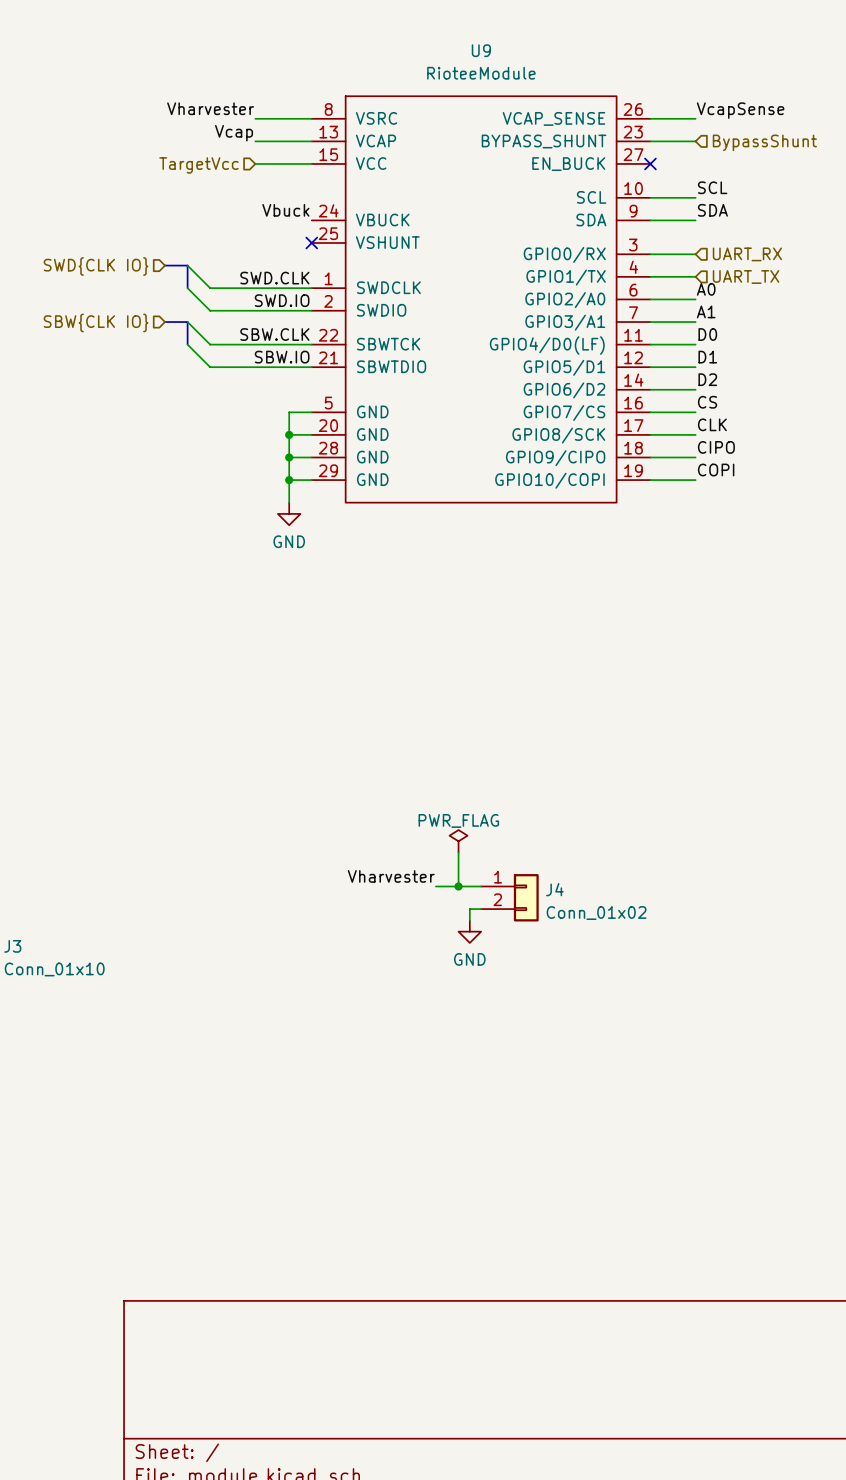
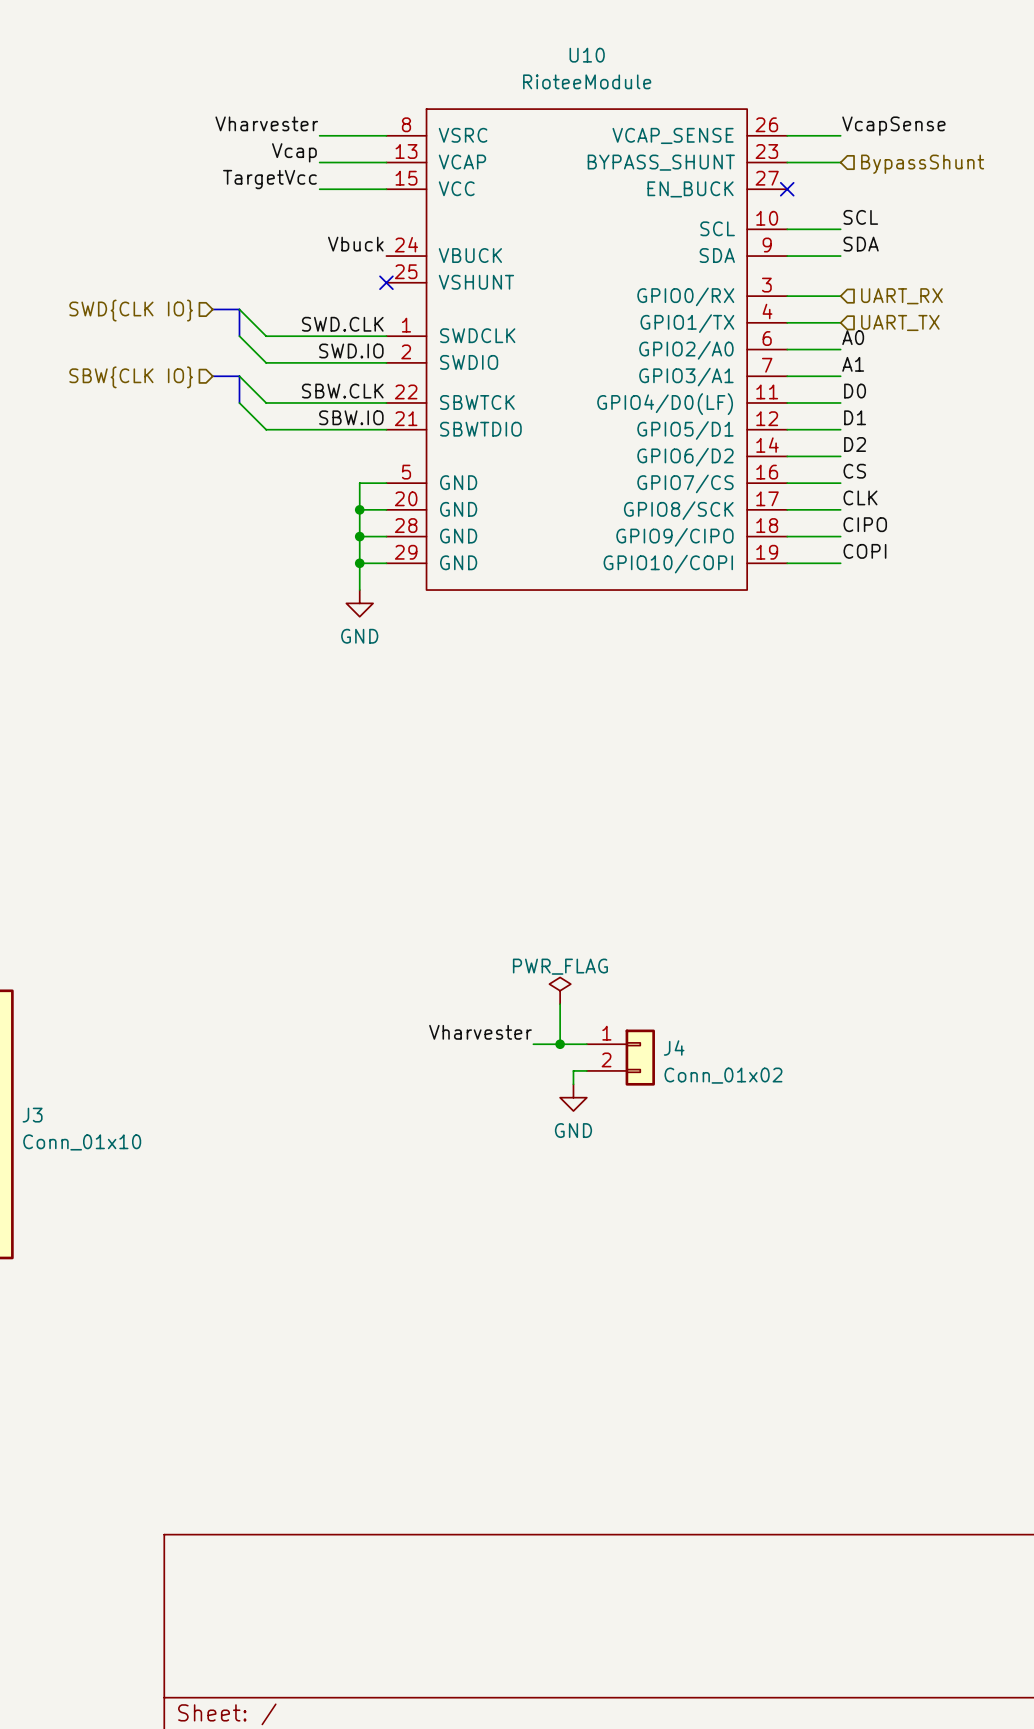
U9 name: U9 (481, 50) -> U10 (587, 55)
label: none -> TargetVcc (269, 179)
hierarchical label: TargetVcc (198, 165) -> none

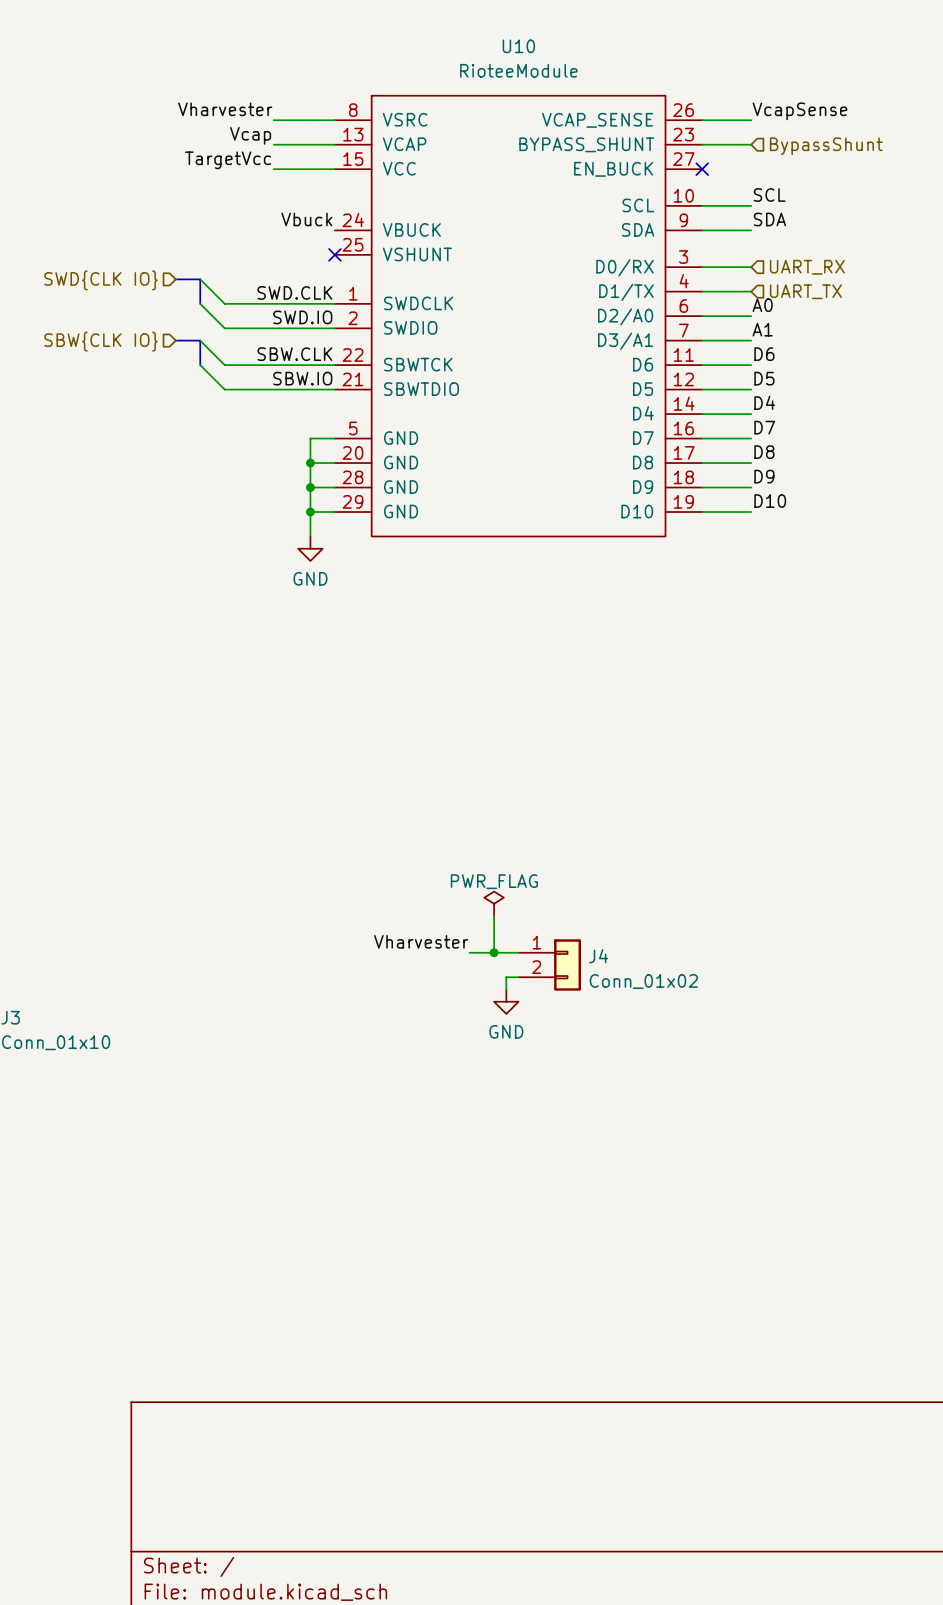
U10 symbol: [386, 109, 788, 591] -> [334, 95, 703, 537]
label: D0 (855, 391) -> D6 (764, 354)
label: D1 (855, 417) -> D5 (764, 378)
label: D2 (855, 444) -> D4 (764, 402)
label: CS (854, 471) -> D7 (764, 427)
label: CLK (860, 497) -> D8 (764, 452)
label: CIPO (865, 524) -> D9 (764, 476)
label: COPI (864, 551) -> D10 (770, 501)

